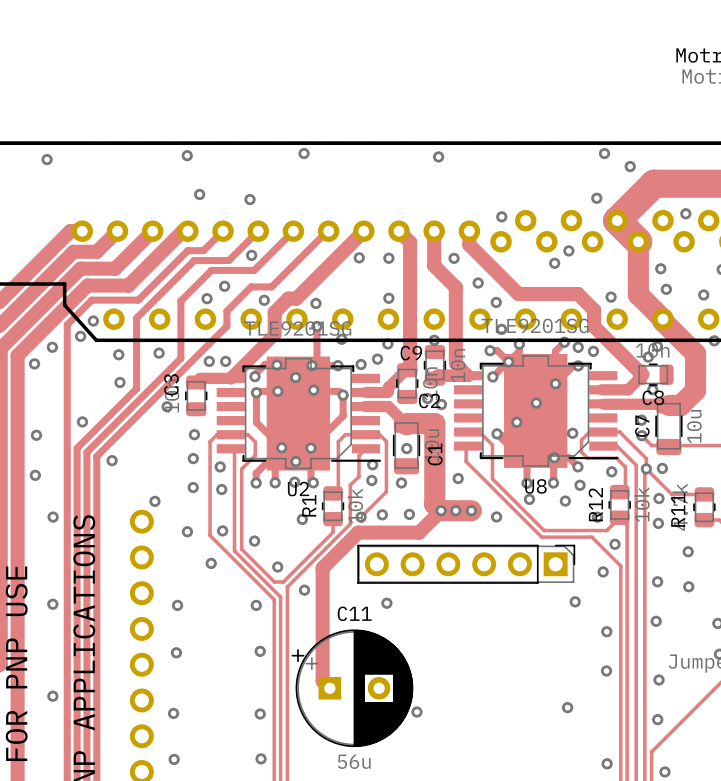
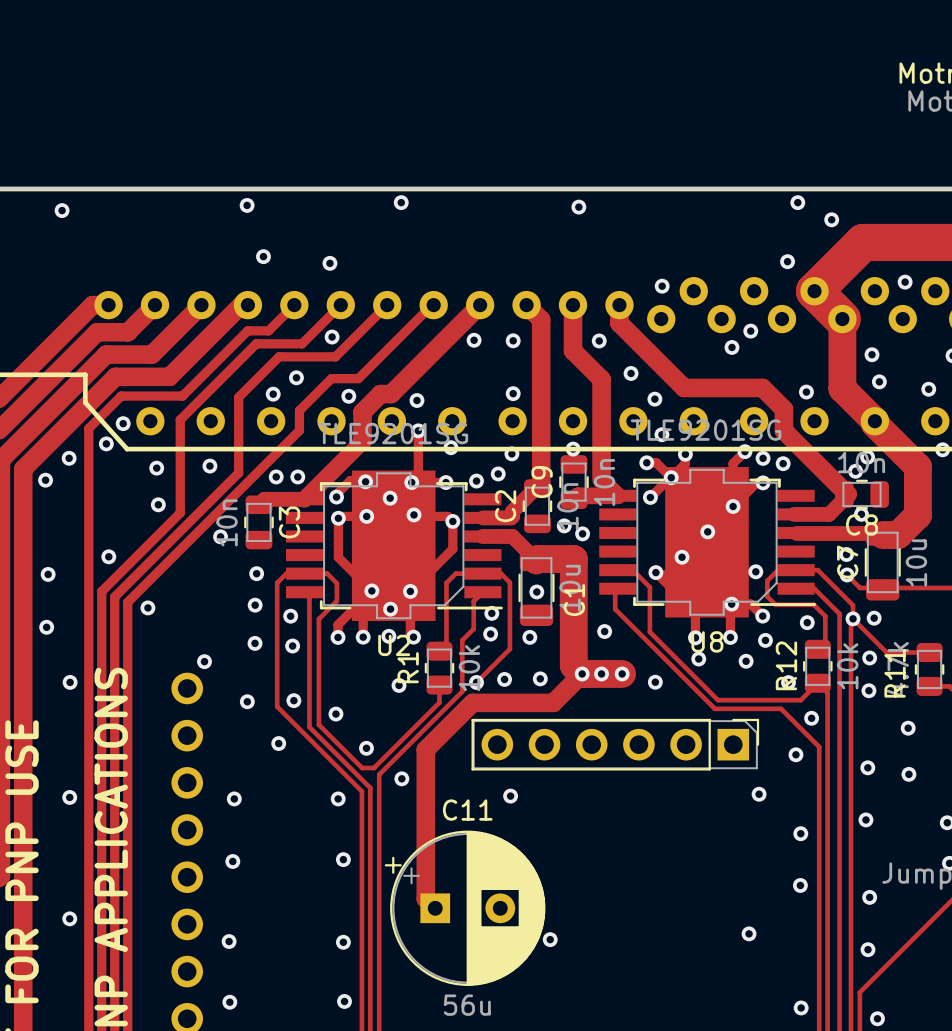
C9 name rotation: 0° (411, 353) -> 90° counterclockwise (542, 482)
C3 name position: C3 (171, 384) -> C3 (289, 522)
C2 name rotation: 0° (429, 400) -> 90° counterclockwise (505, 506)
C2 name position: C2 (429, 400) -> C2 (505, 506)

